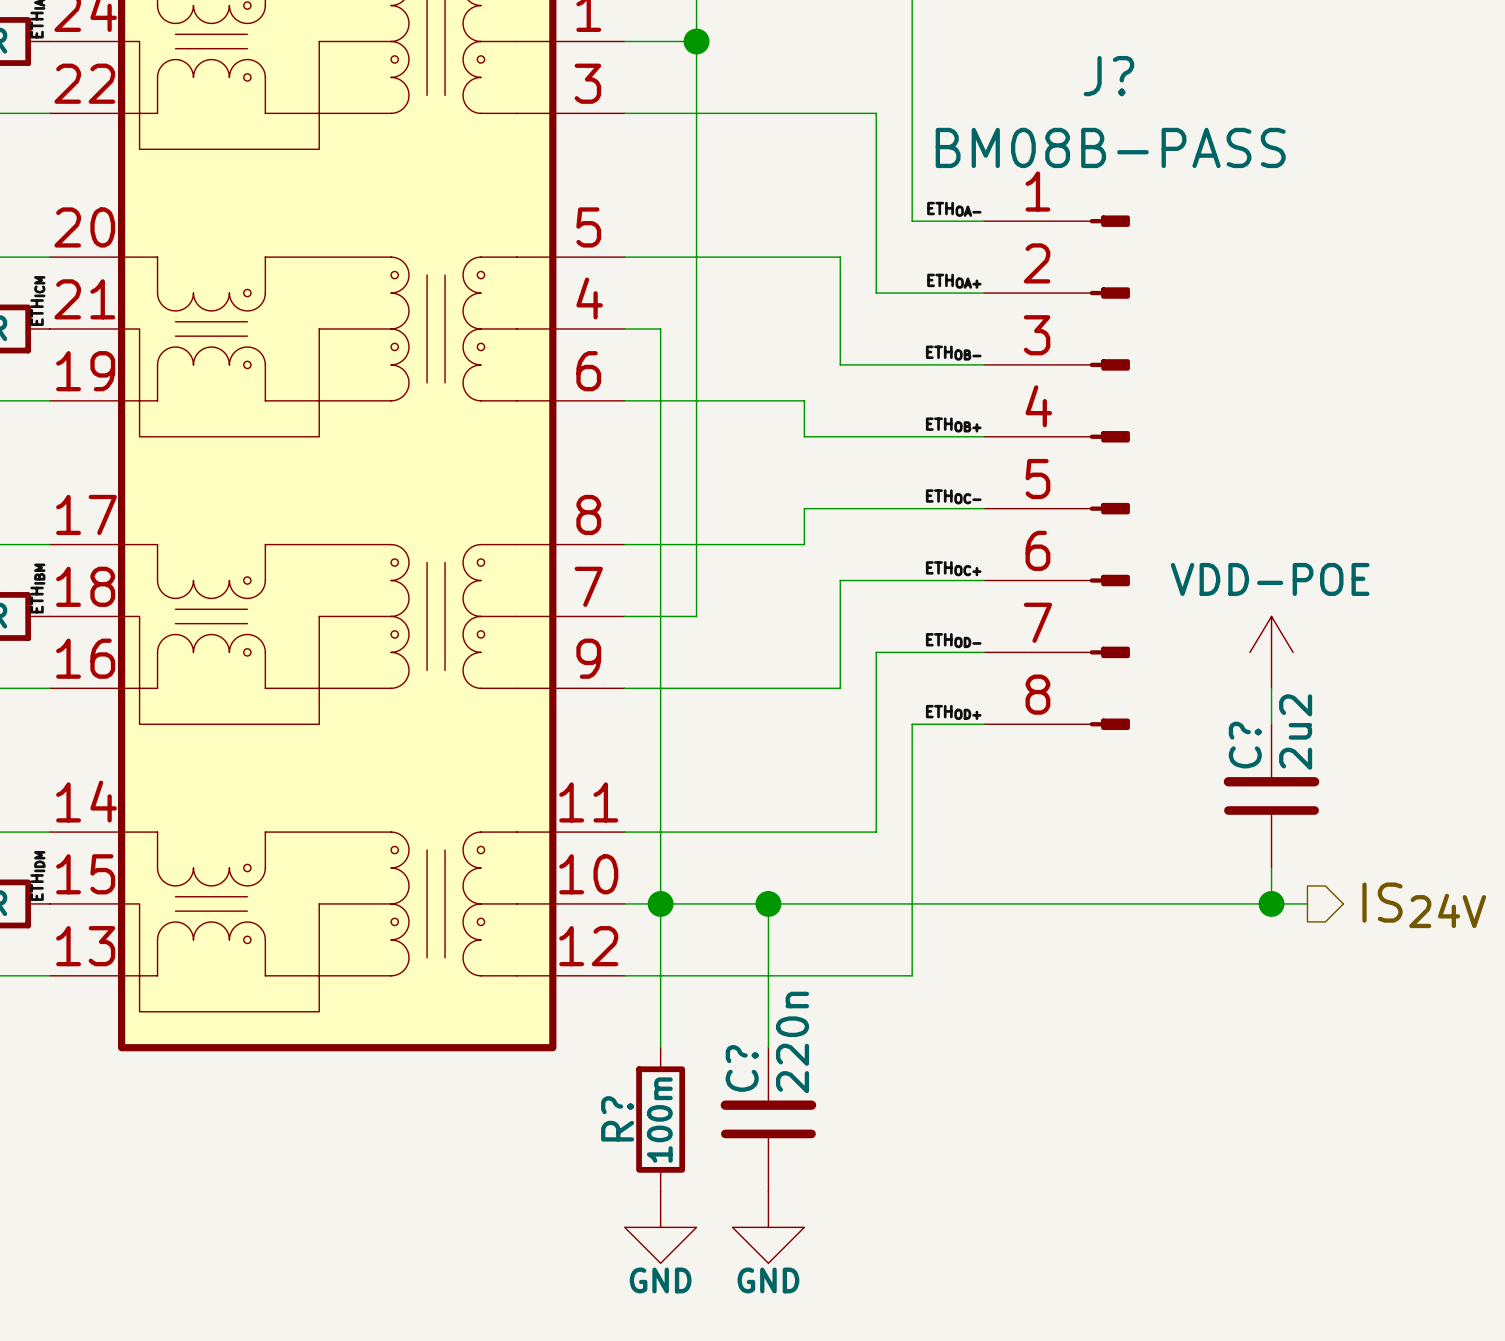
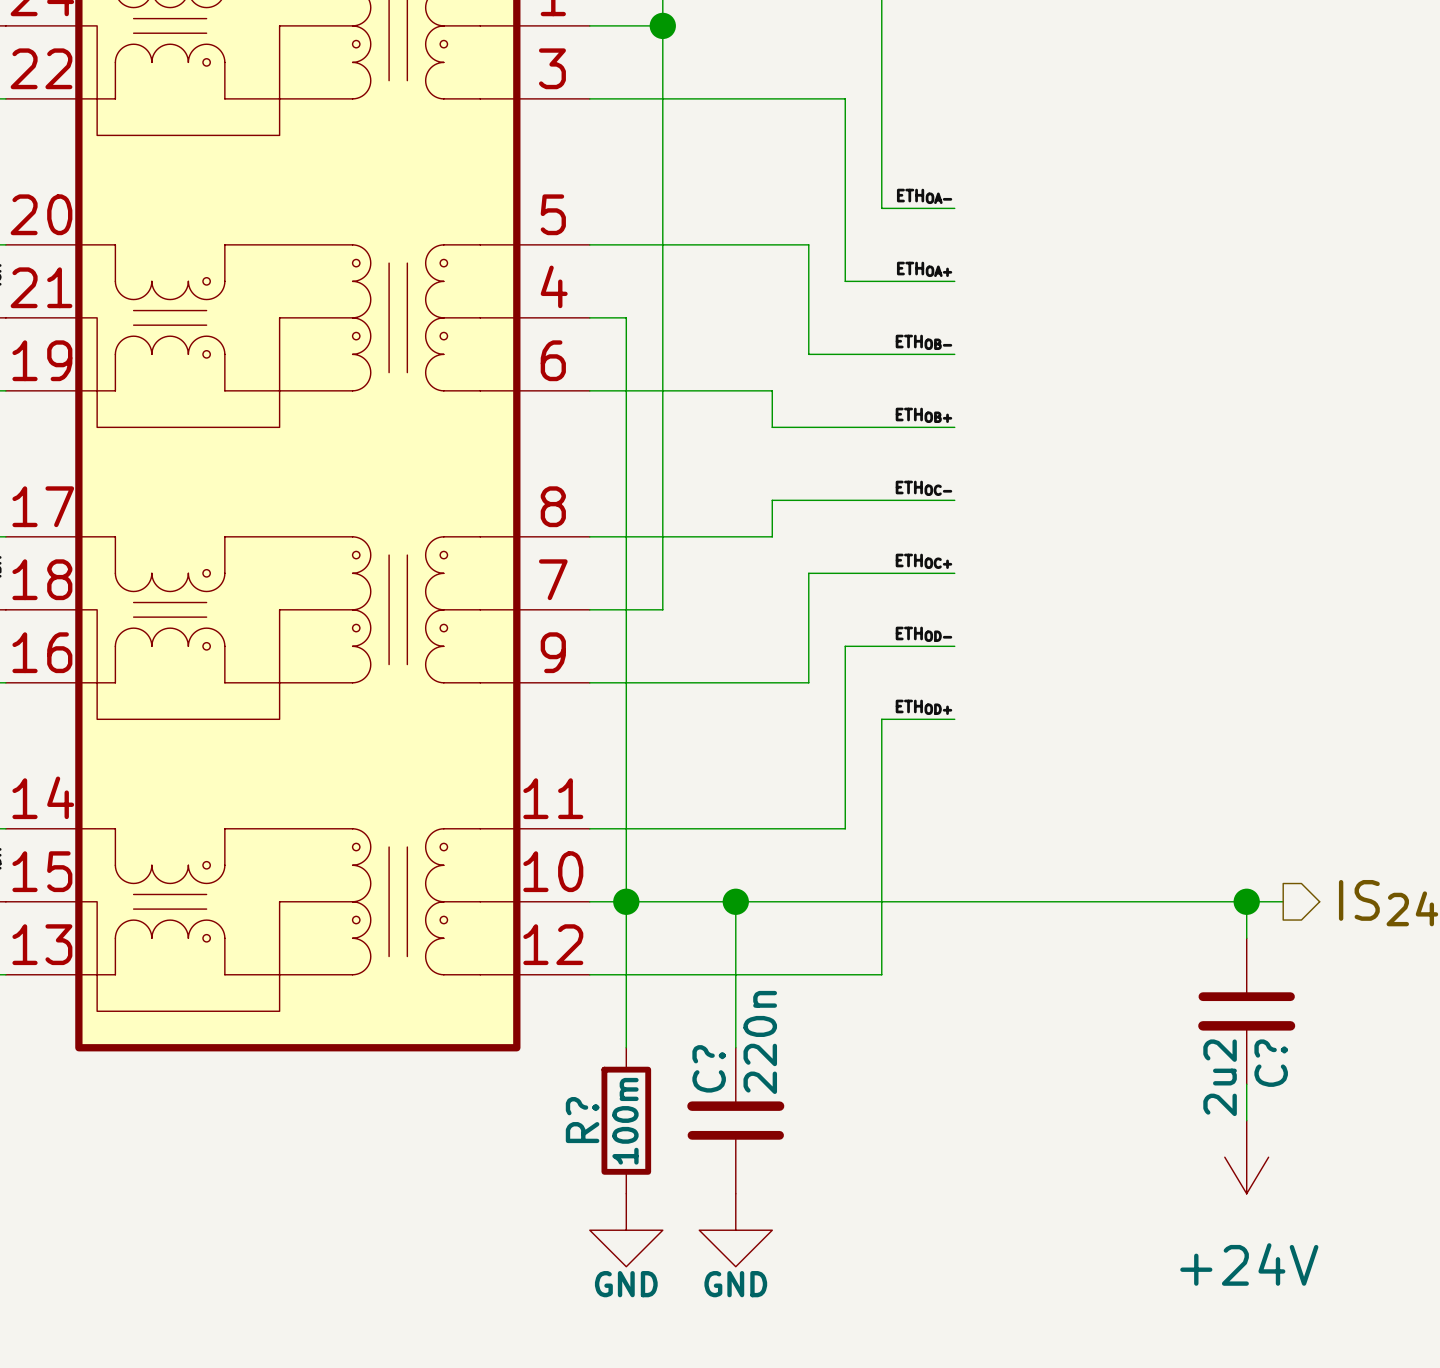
J?: BM08B-PASS (1056, 472) -> none
power symbol: VDD-POE (1271, 652) -> none
wire: (1271, 688) (1271, 724) -> (1246, 1084) (1246, 1120)
C? rotation: 0° (1271, 795) -> 180° (1246, 1011)
C? position: (1271, 796) -> (1246, 1011)
wire: (1271, 868) (1271, 903) -> (1246, 938) (1246, 901)
power symbol: none -> +24V (1246, 1157)

